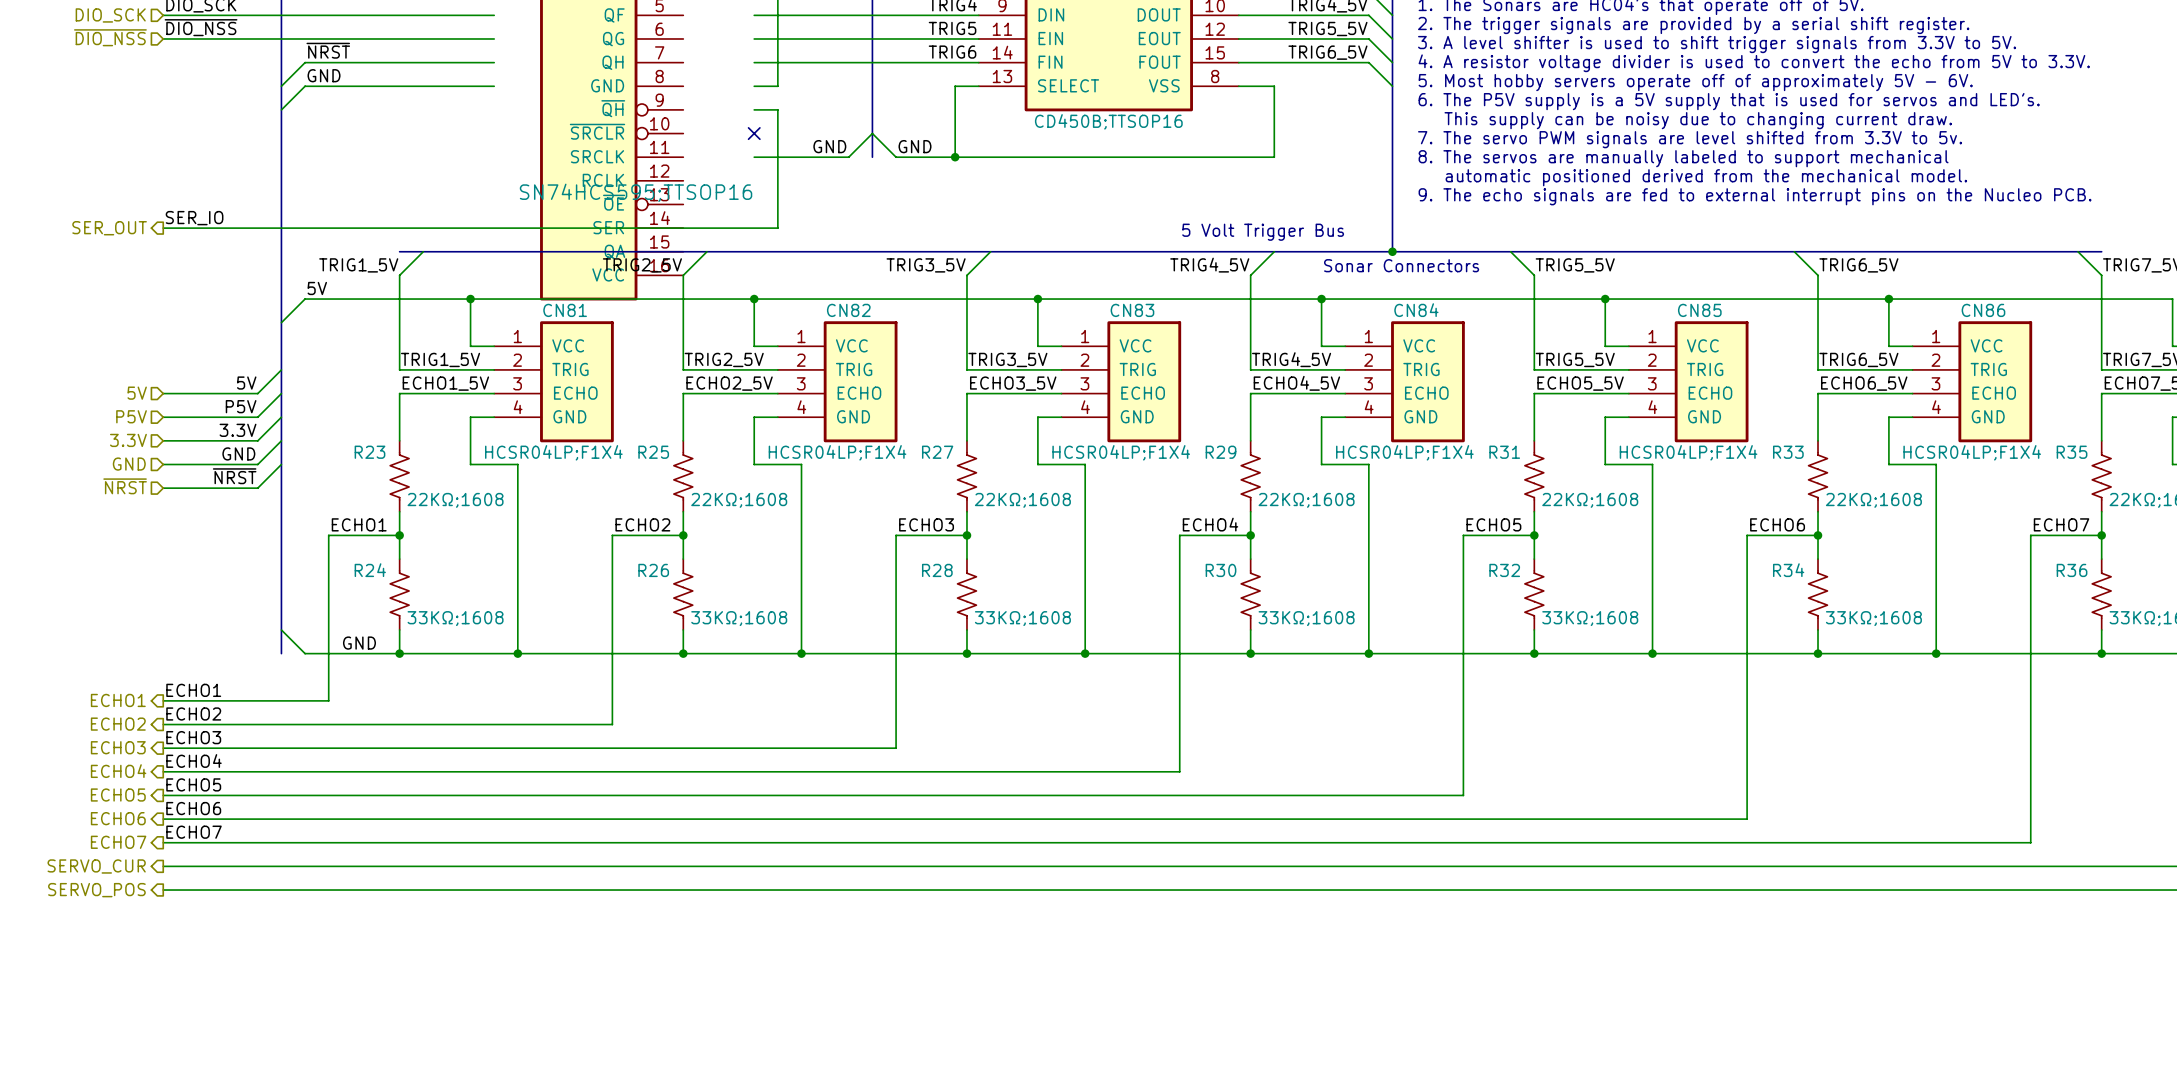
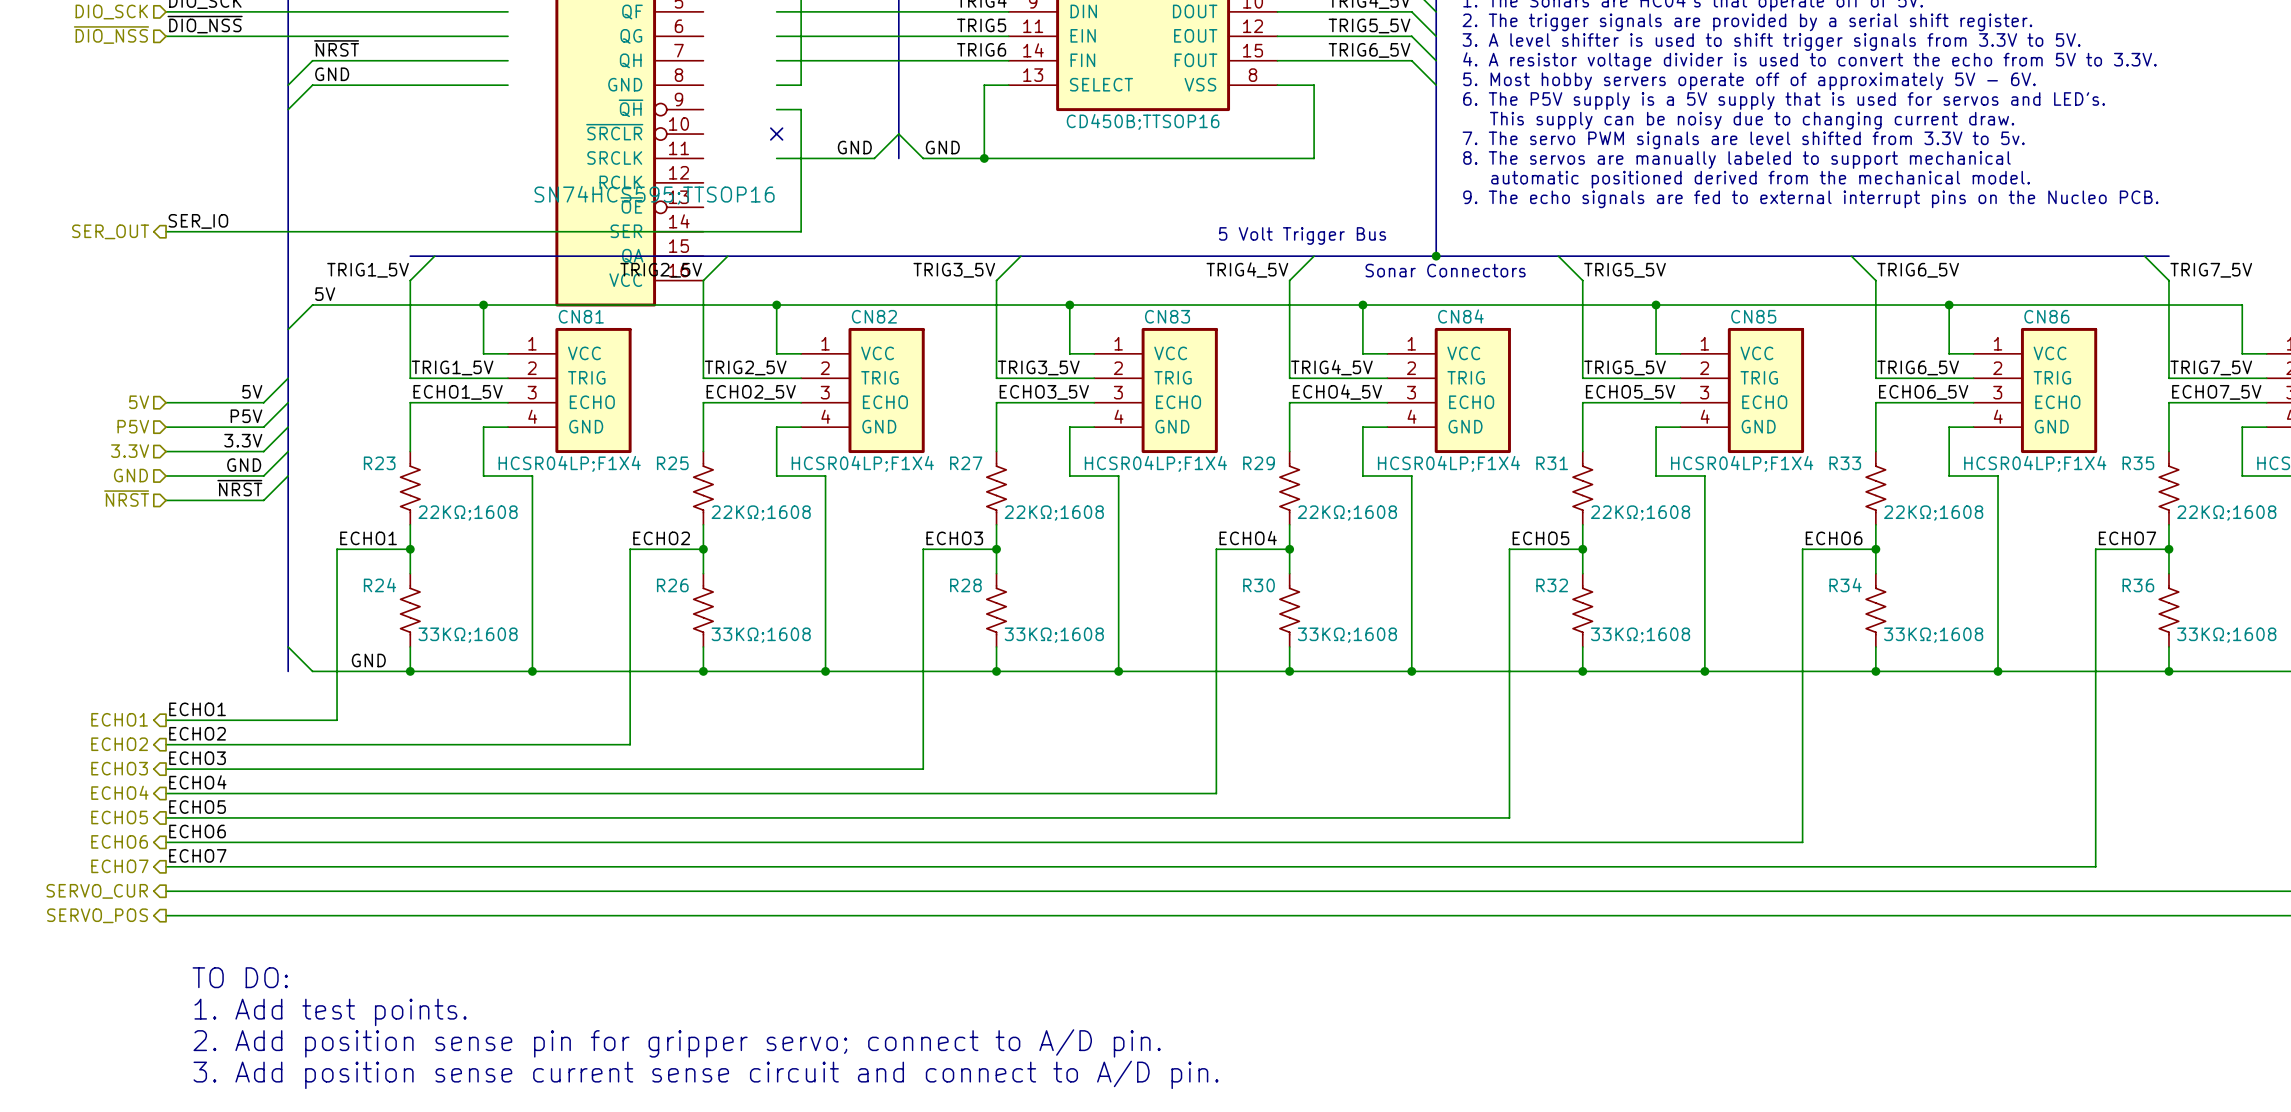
text: none -> TO DO: (240, 977)
text: none -> 1. Add test points. (330, 1012)
text: none -> 2. Add position sense pin for gripper servo; connect to A/D pin. (677, 1043)
text: none -> 3. Add position sense current sense circuit and connect to A/D pin. (706, 1074)

